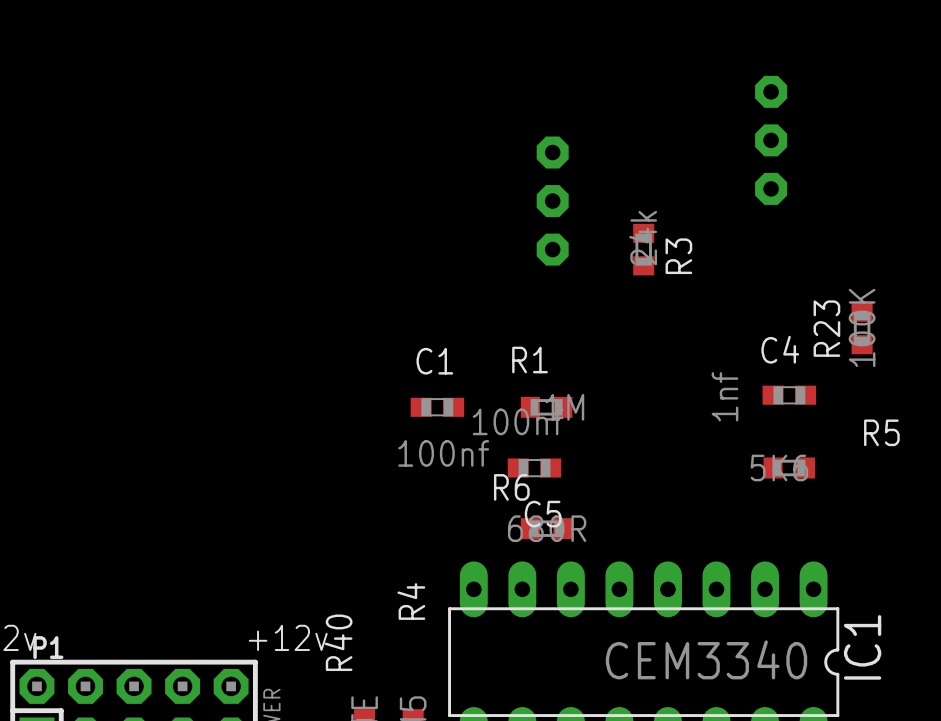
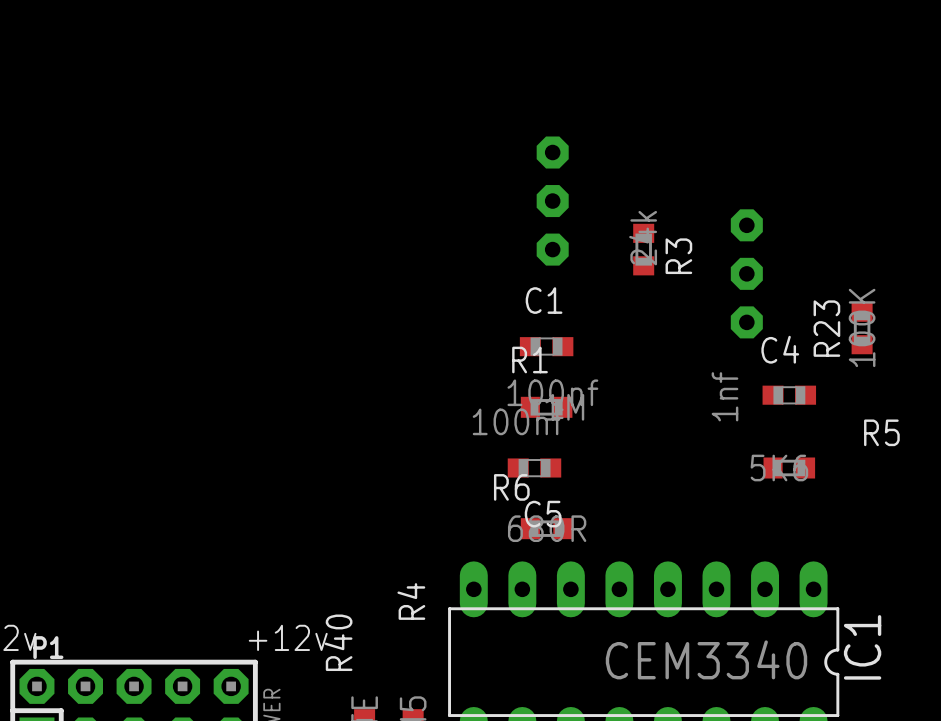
part: (771, 140) -> none
part: none -> (746, 273)
C1 position: (437, 407) -> (546, 346)

